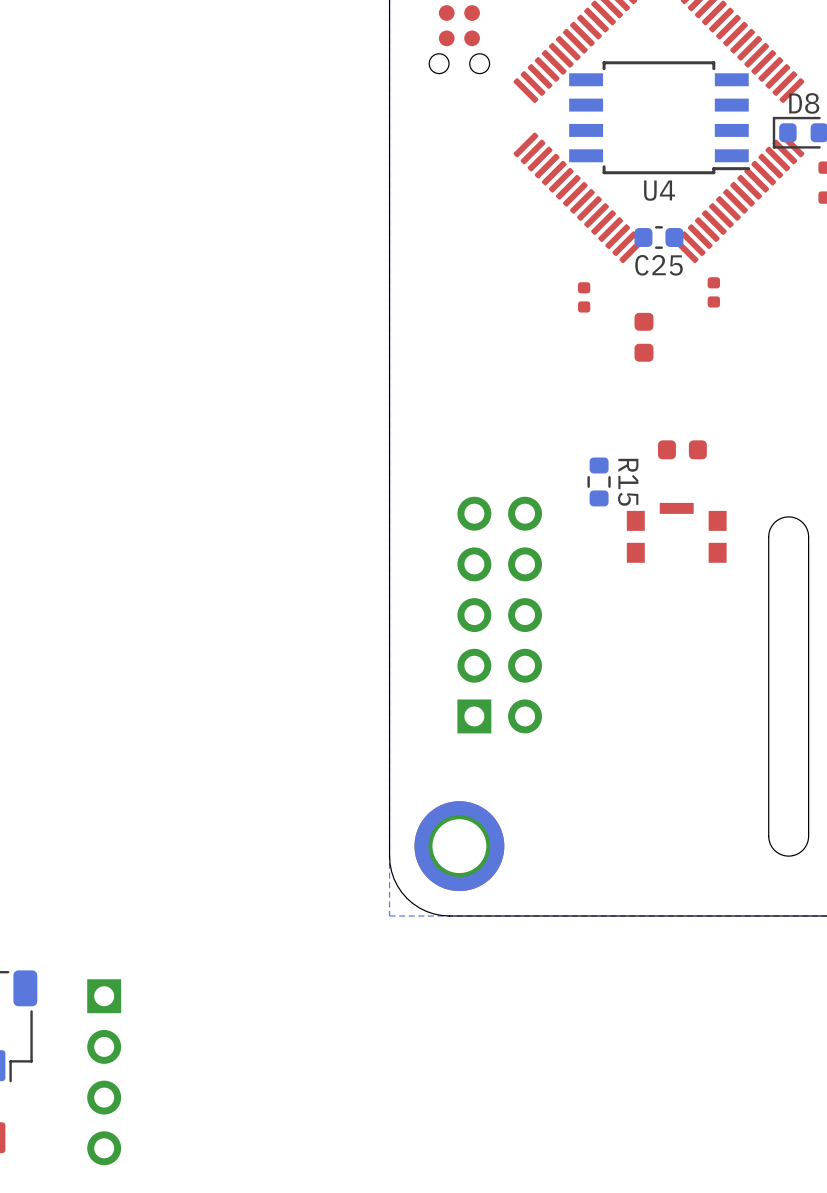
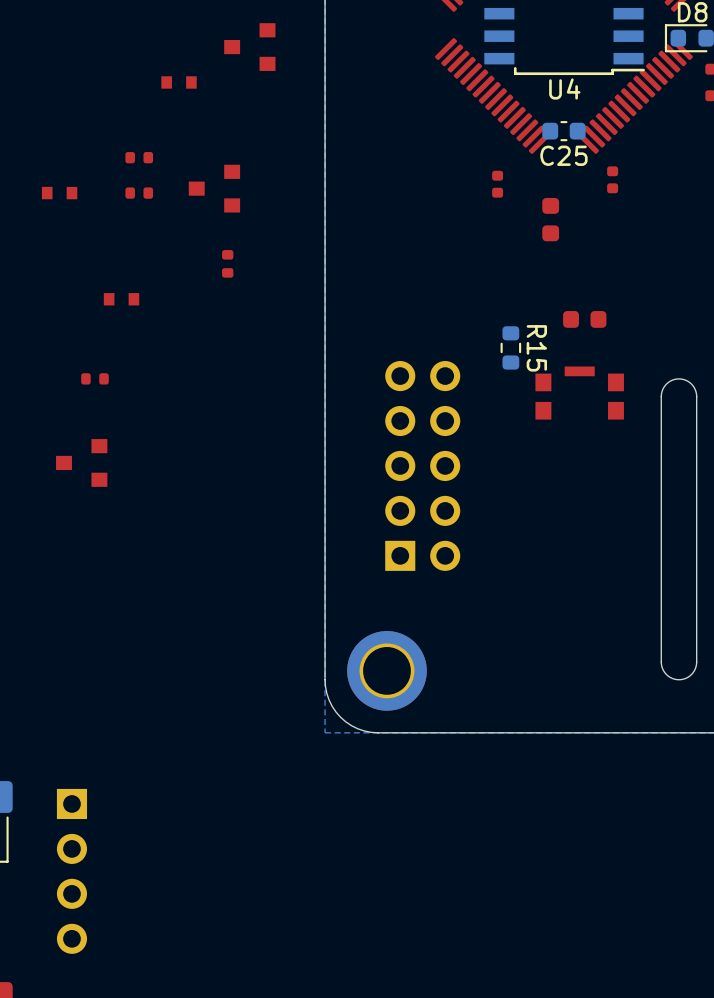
part: none -> (249, 47)
part: none -> (179, 82)
part: none -> (139, 157)
part: none -> (214, 188)
part: none -> (59, 193)
part: none -> (139, 193)
part: none -> (227, 263)
part: none -> (121, 299)
part: none -> (94, 378)
part: none -> (81, 462)

